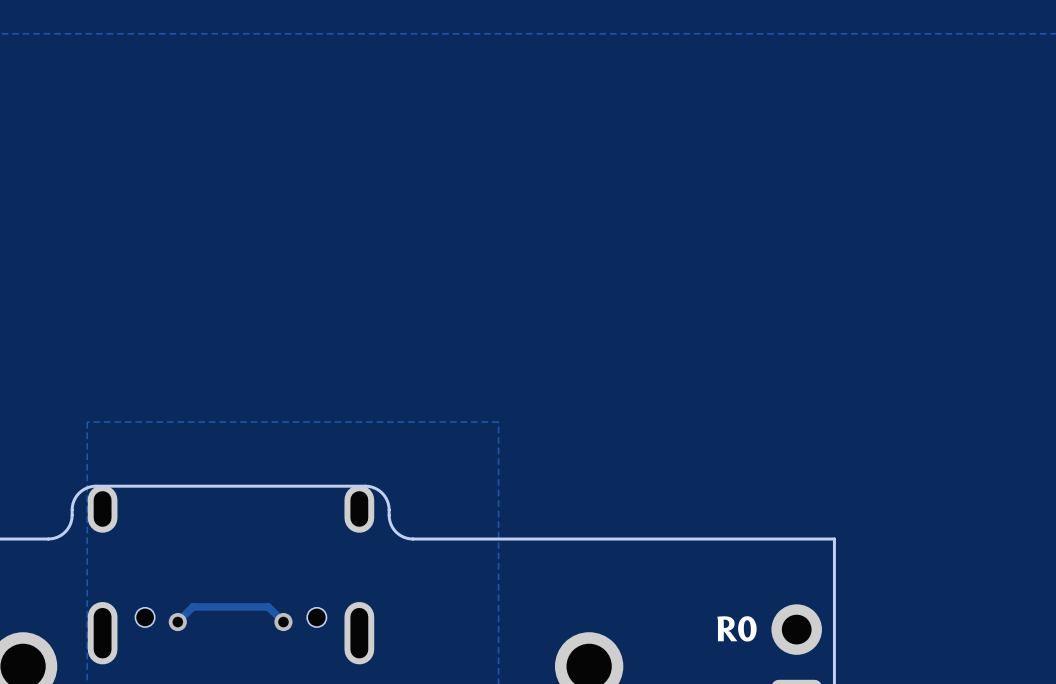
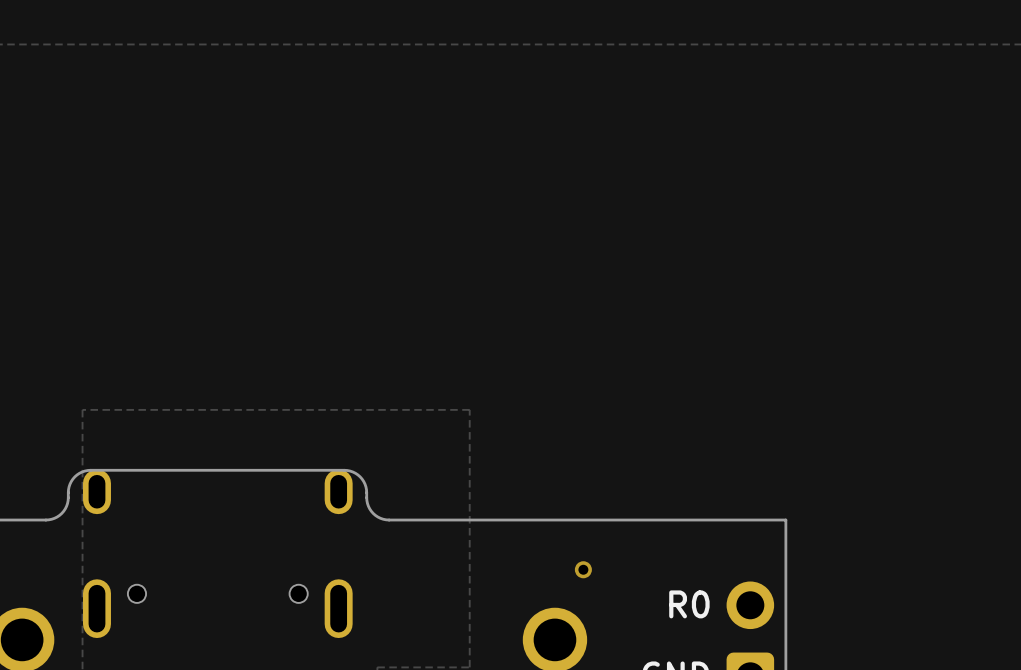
via: none -> (583, 569)
via: (177, 622) -> none
track: (283, 622) (268, 606) (192, 606) (177, 622) -> none
via: (283, 622) -> none

